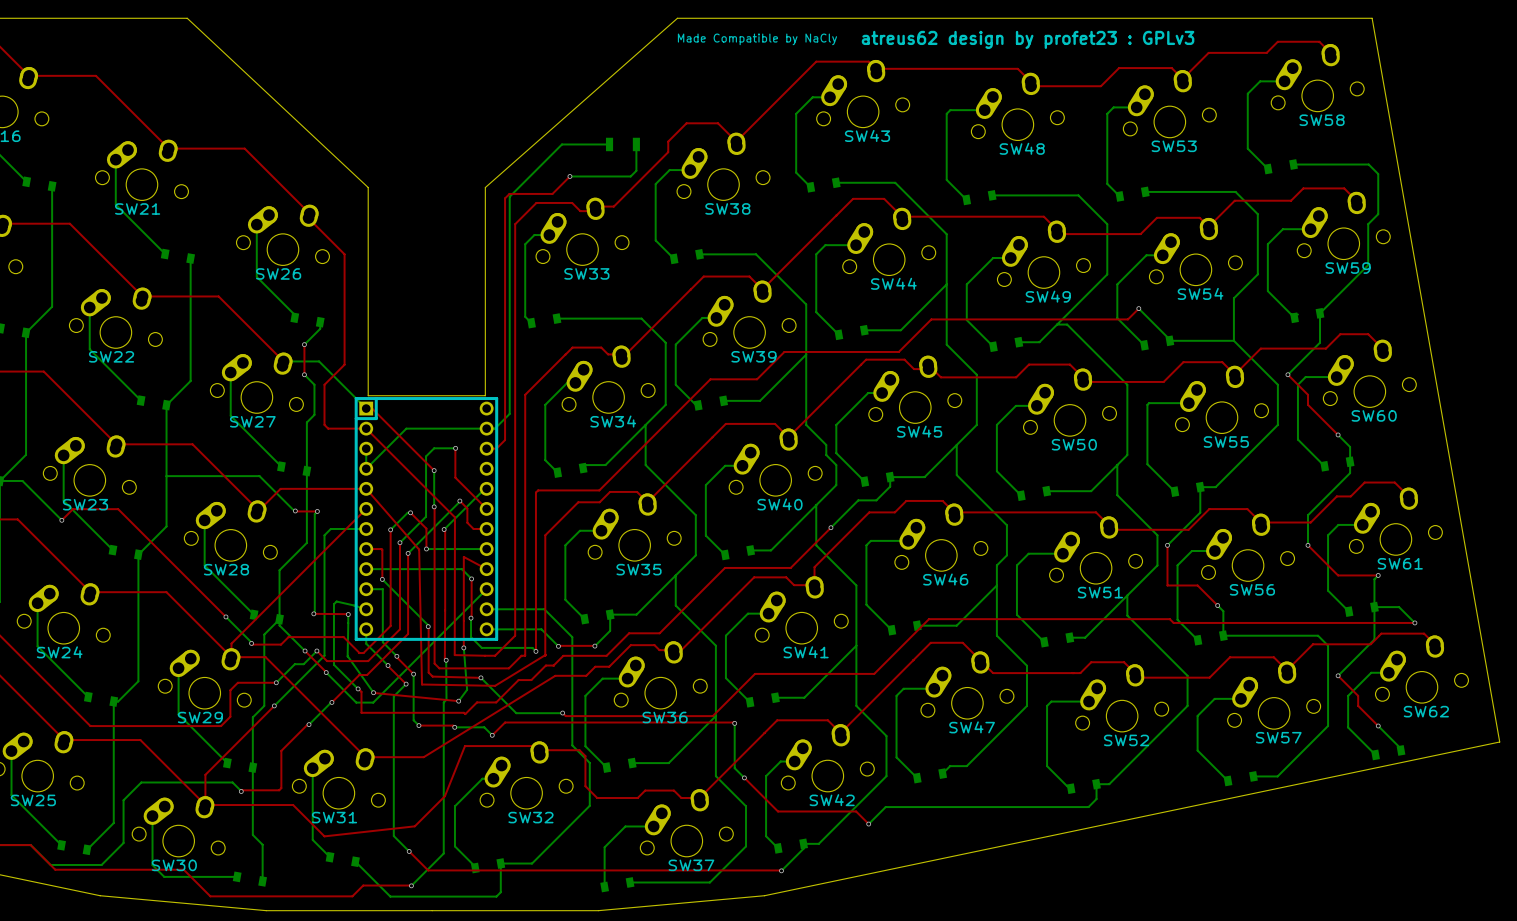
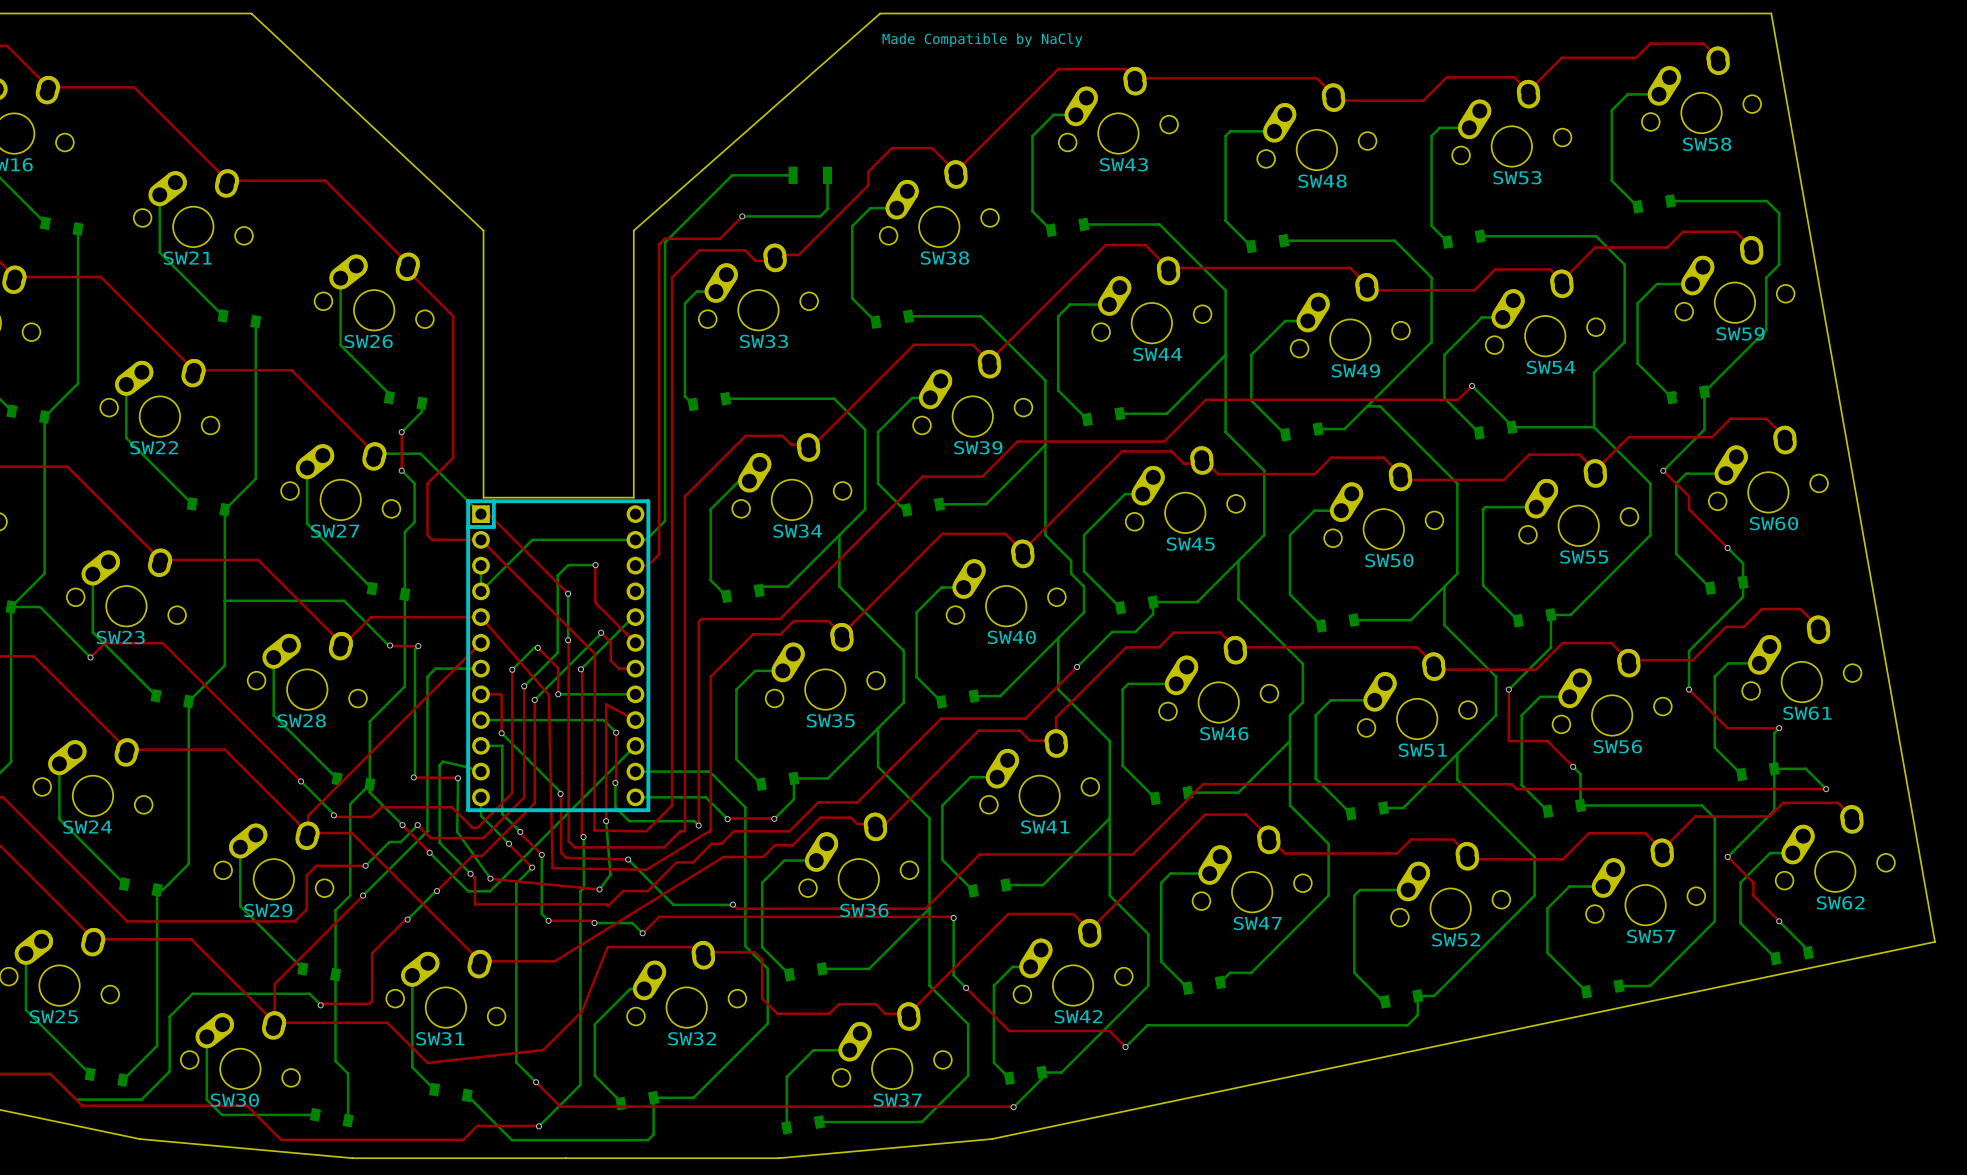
text: atreus62 design by profet23 : GPLv3 (1028, 39) -> none

